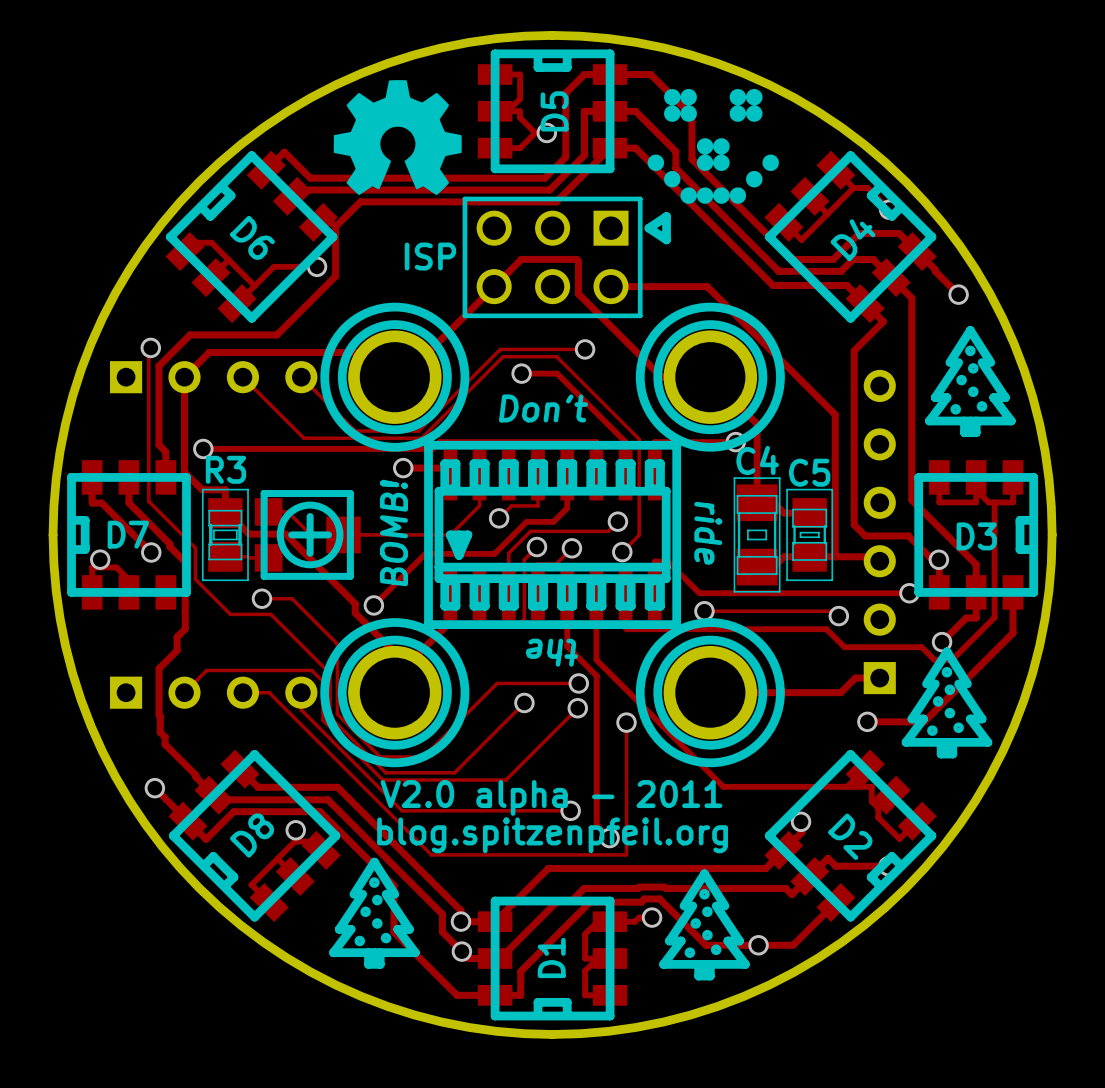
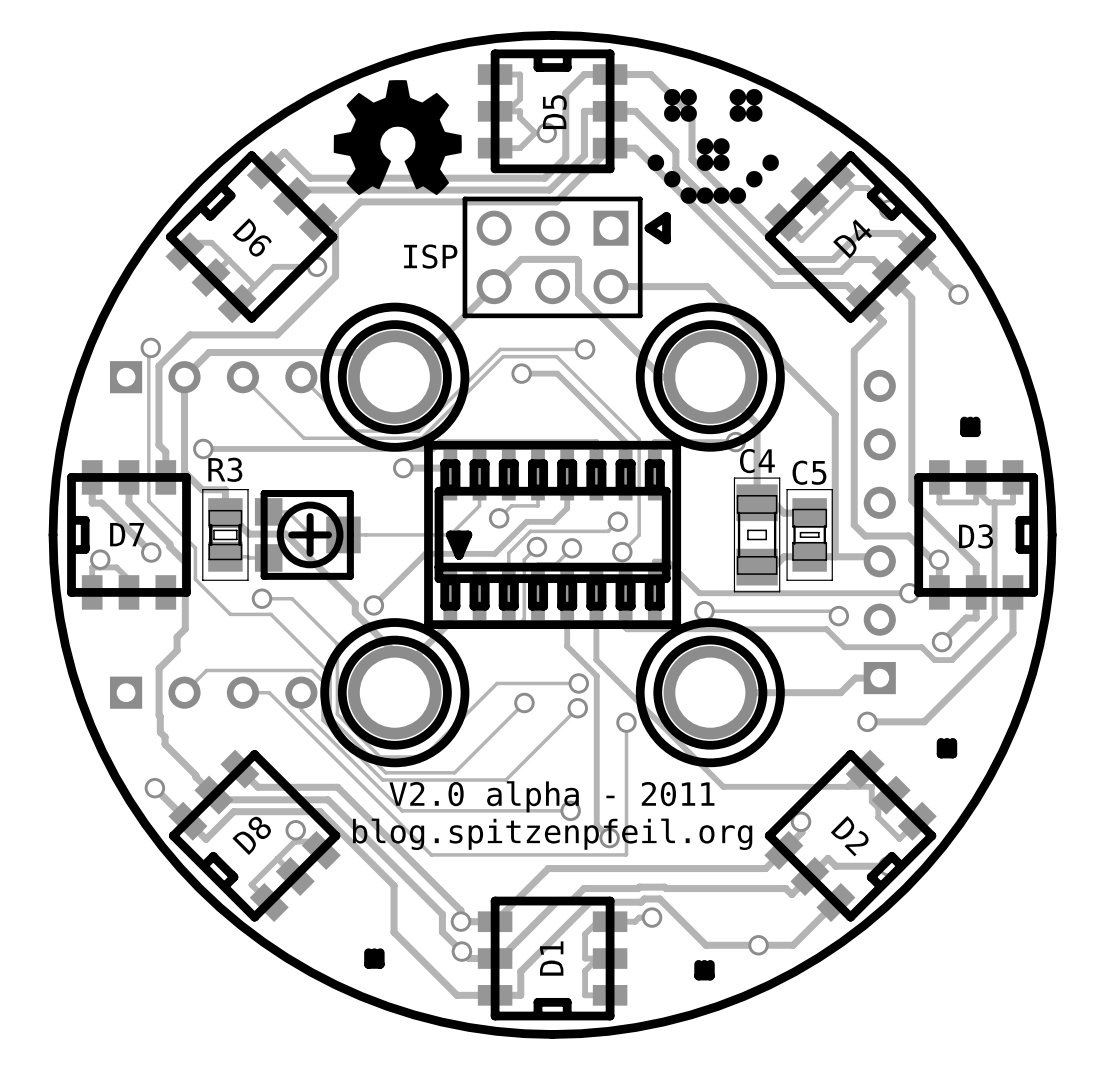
drawing: [950, 345, 988, 415] -> none
line: (949, 362) (970, 330) (990, 362) -> none
line: (958, 362) (935, 397) (946, 397) (929, 421) (1011, 421) (993, 397) (1005, 397) (982, 362) -> none
text: Don't (543, 408) -> none
text: BOMB! (393, 532) -> none
text: ride (708, 533) -> none
text: the (551, 652) -> none
drawing: [927, 666, 964, 736] -> none
line: (926, 683) (946, 651) (967, 683) -> none
line: (935, 683) (911, 718) (923, 718) (906, 742) (987, 742) (970, 718) (982, 718) (958, 683) -> none
drawing: [354, 877, 392, 947] -> none
drawing: [684, 889, 722, 958] -> none
line: (353, 894) (374, 862) (394, 894) -> none
line: (362, 894) (339, 929) (351, 929) (333, 952) (415, 952) (397, 929) (409, 929) (386, 894) -> none
line: (684, 905) (704, 873) (724, 905) -> none
line: (692, 905) (669, 941) (681, 941) (663, 964) (745, 964) (727, 941) (739, 941) (716, 905) -> none

